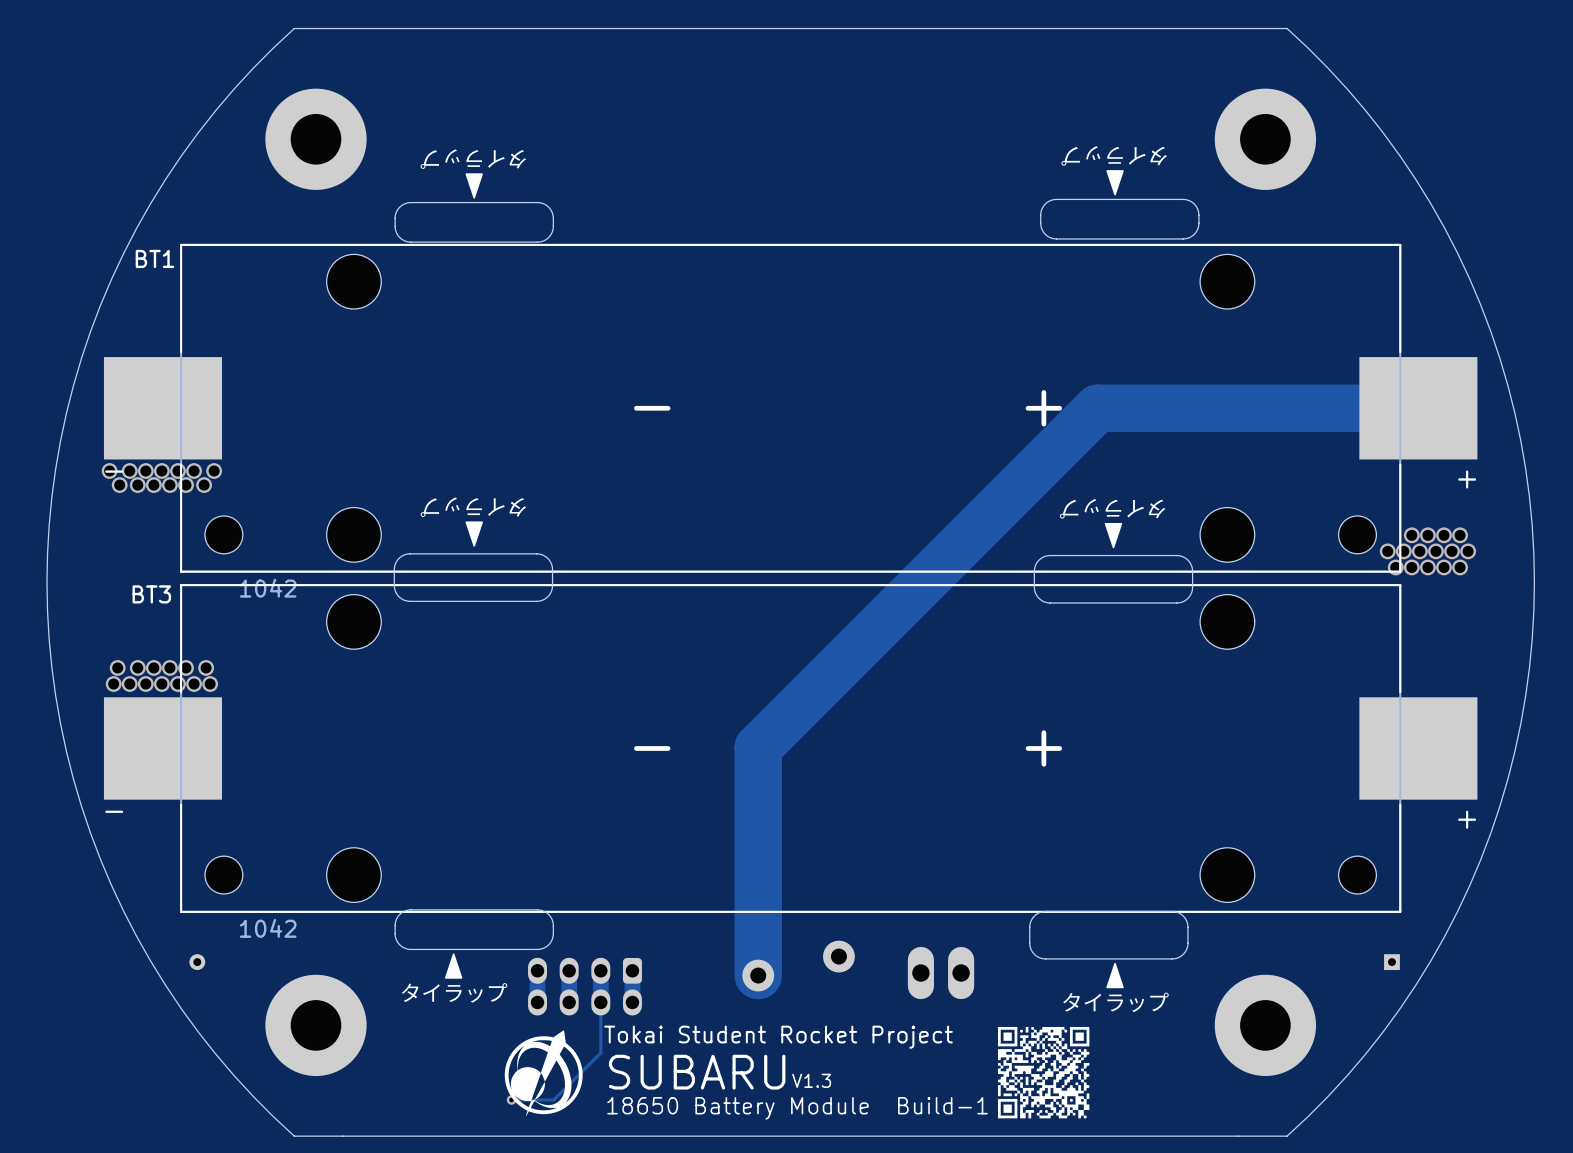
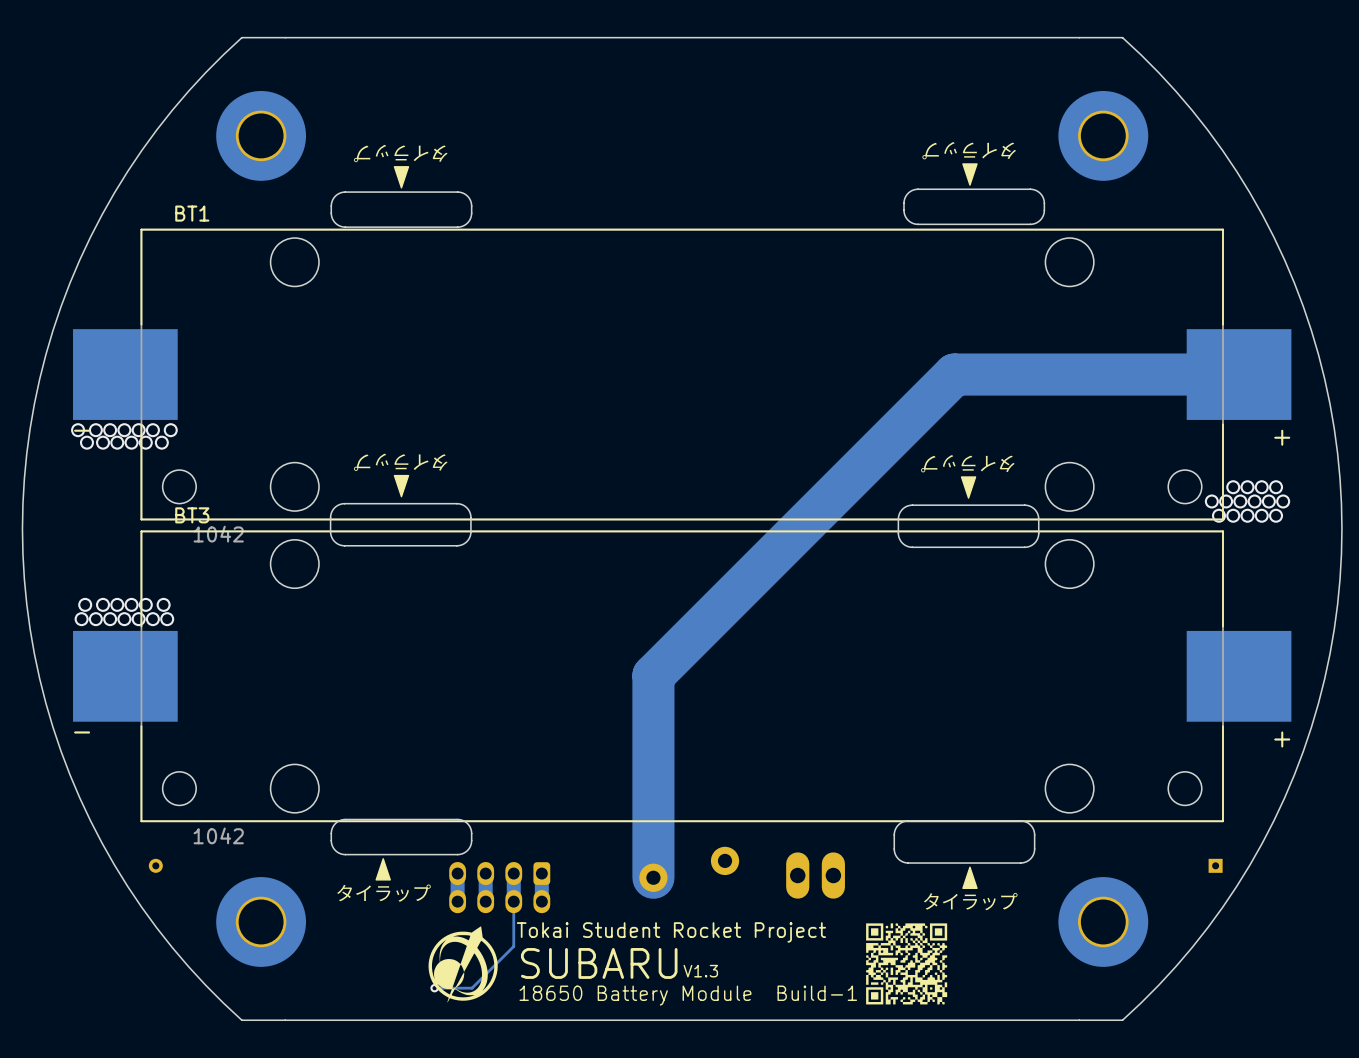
BT1 footprint: [103, 243, 1478, 573] -> [73, 228, 1292, 521]
BT1 name position: BT1 (154, 258) -> BT1 (192, 213)
BT3 footprint: [103, 584, 1478, 913] -> [73, 530, 1292, 823]
BT3 name position: BT3 (151, 594) -> BT3 (192, 515)

